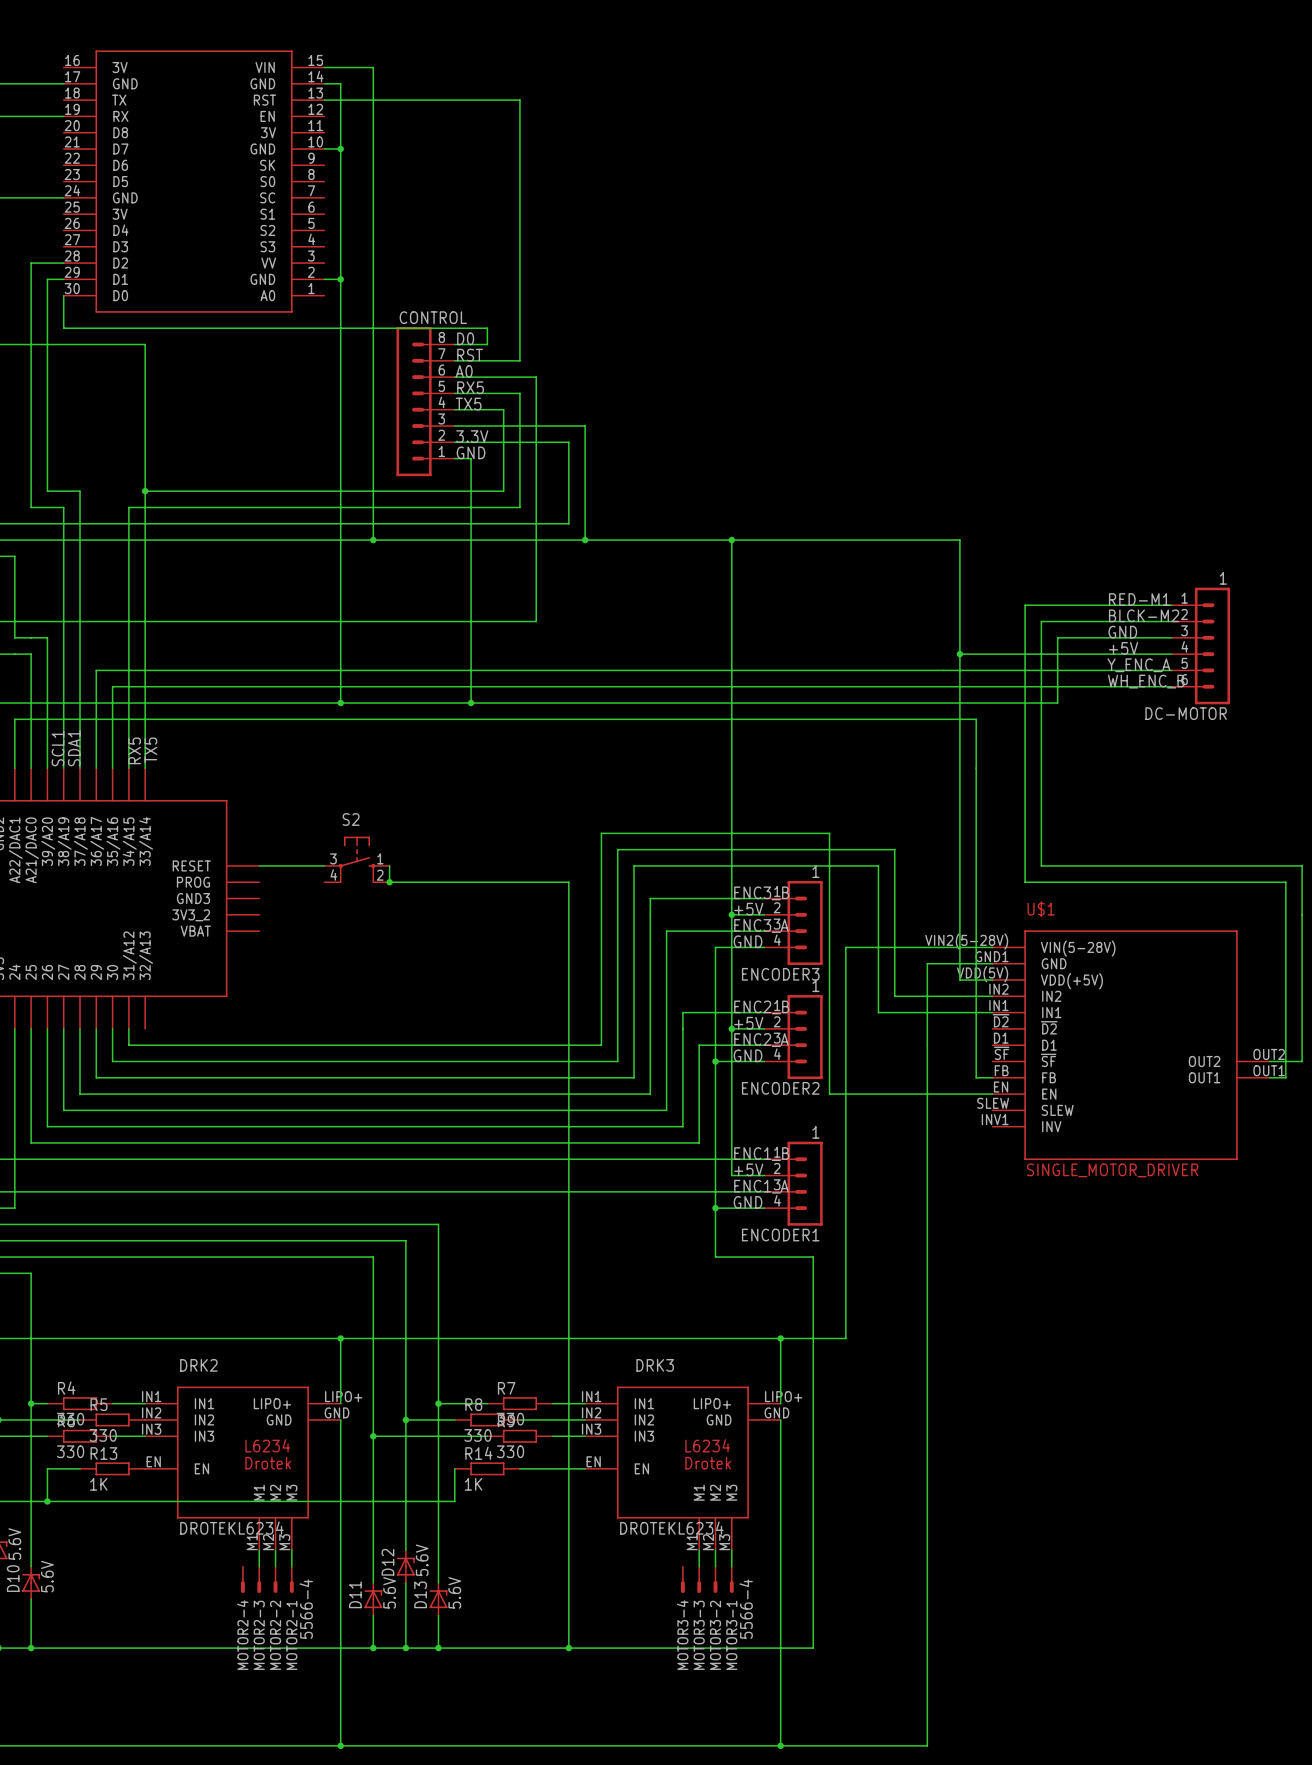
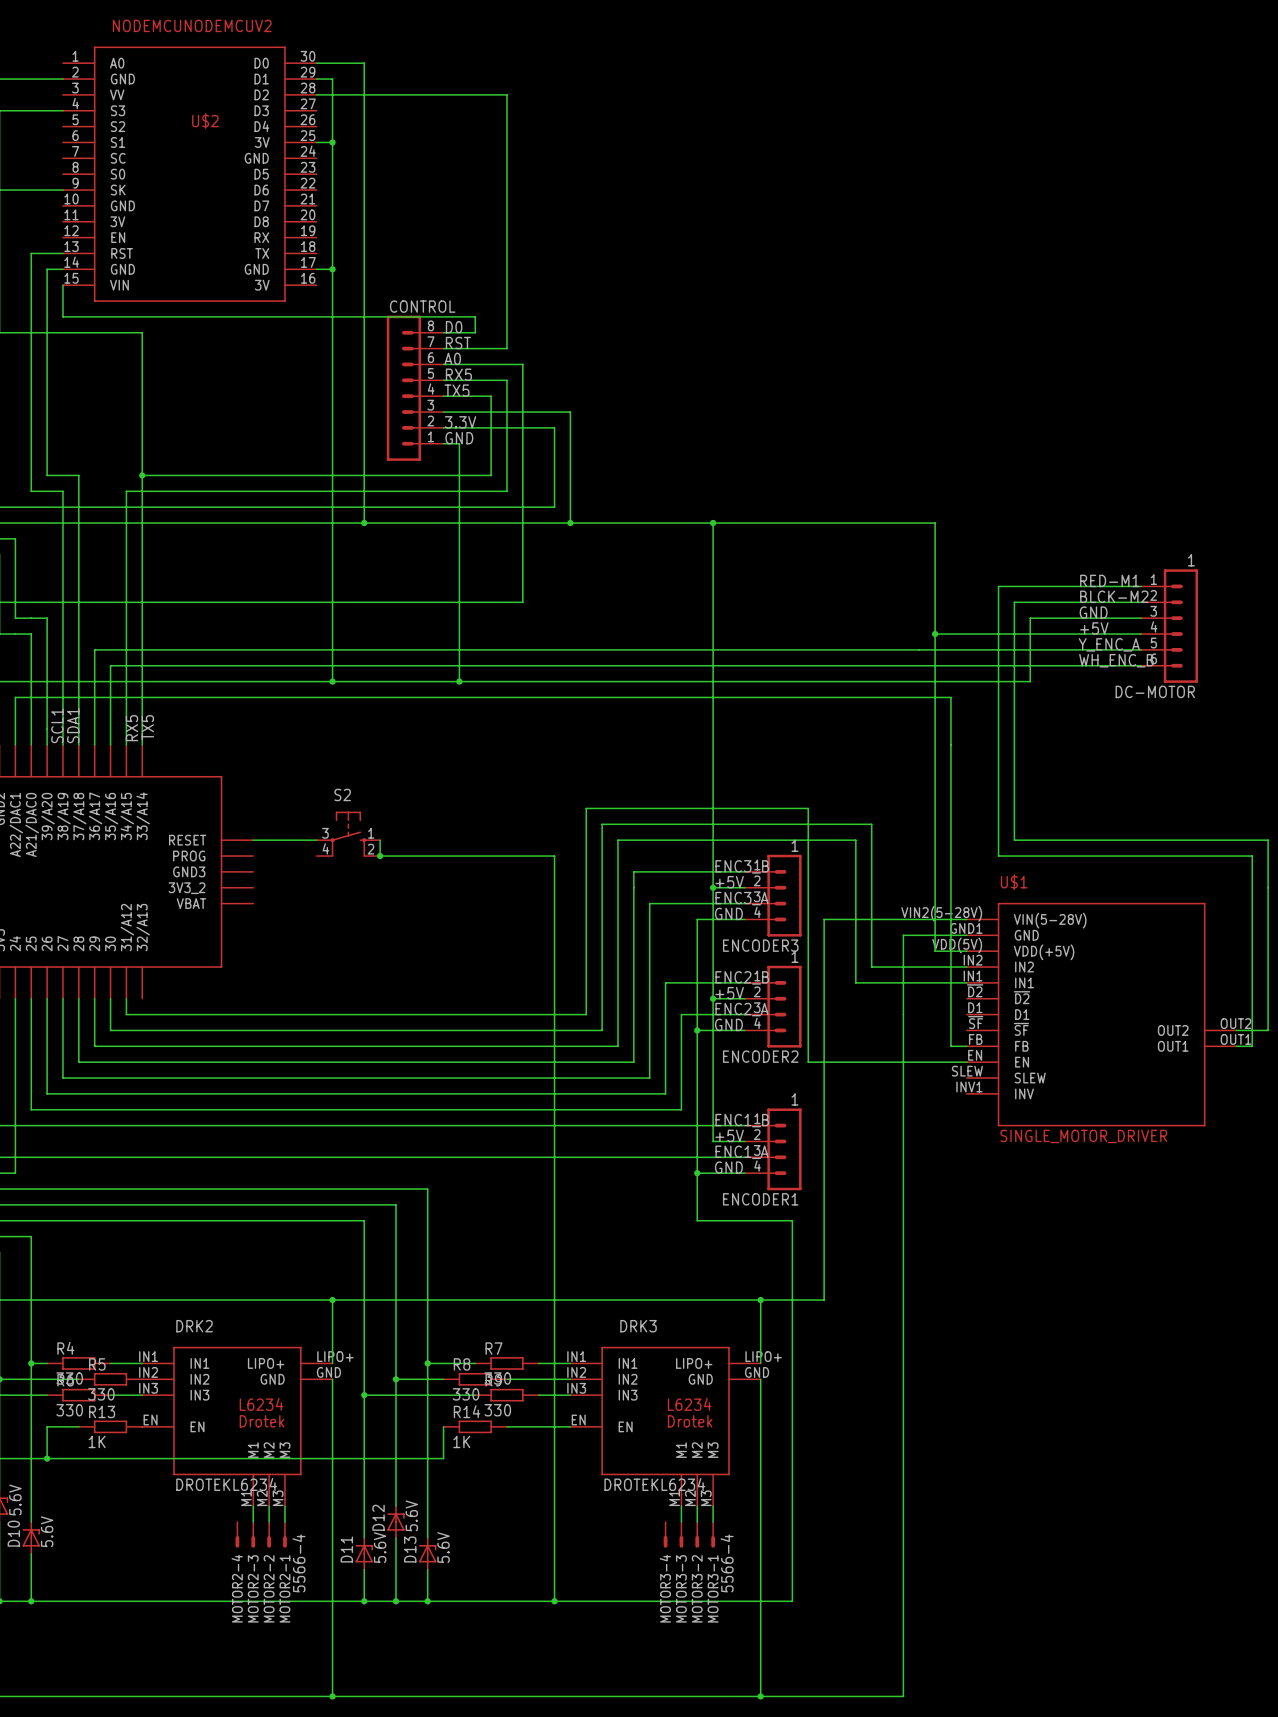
U$2 value: none -> NODEMCUNODEMCUV2 (192, 25)
U$2 name: none -> U$2 (205, 121)
U$2 rotation: 0° (194, 181) -> 180° (189, 174)

